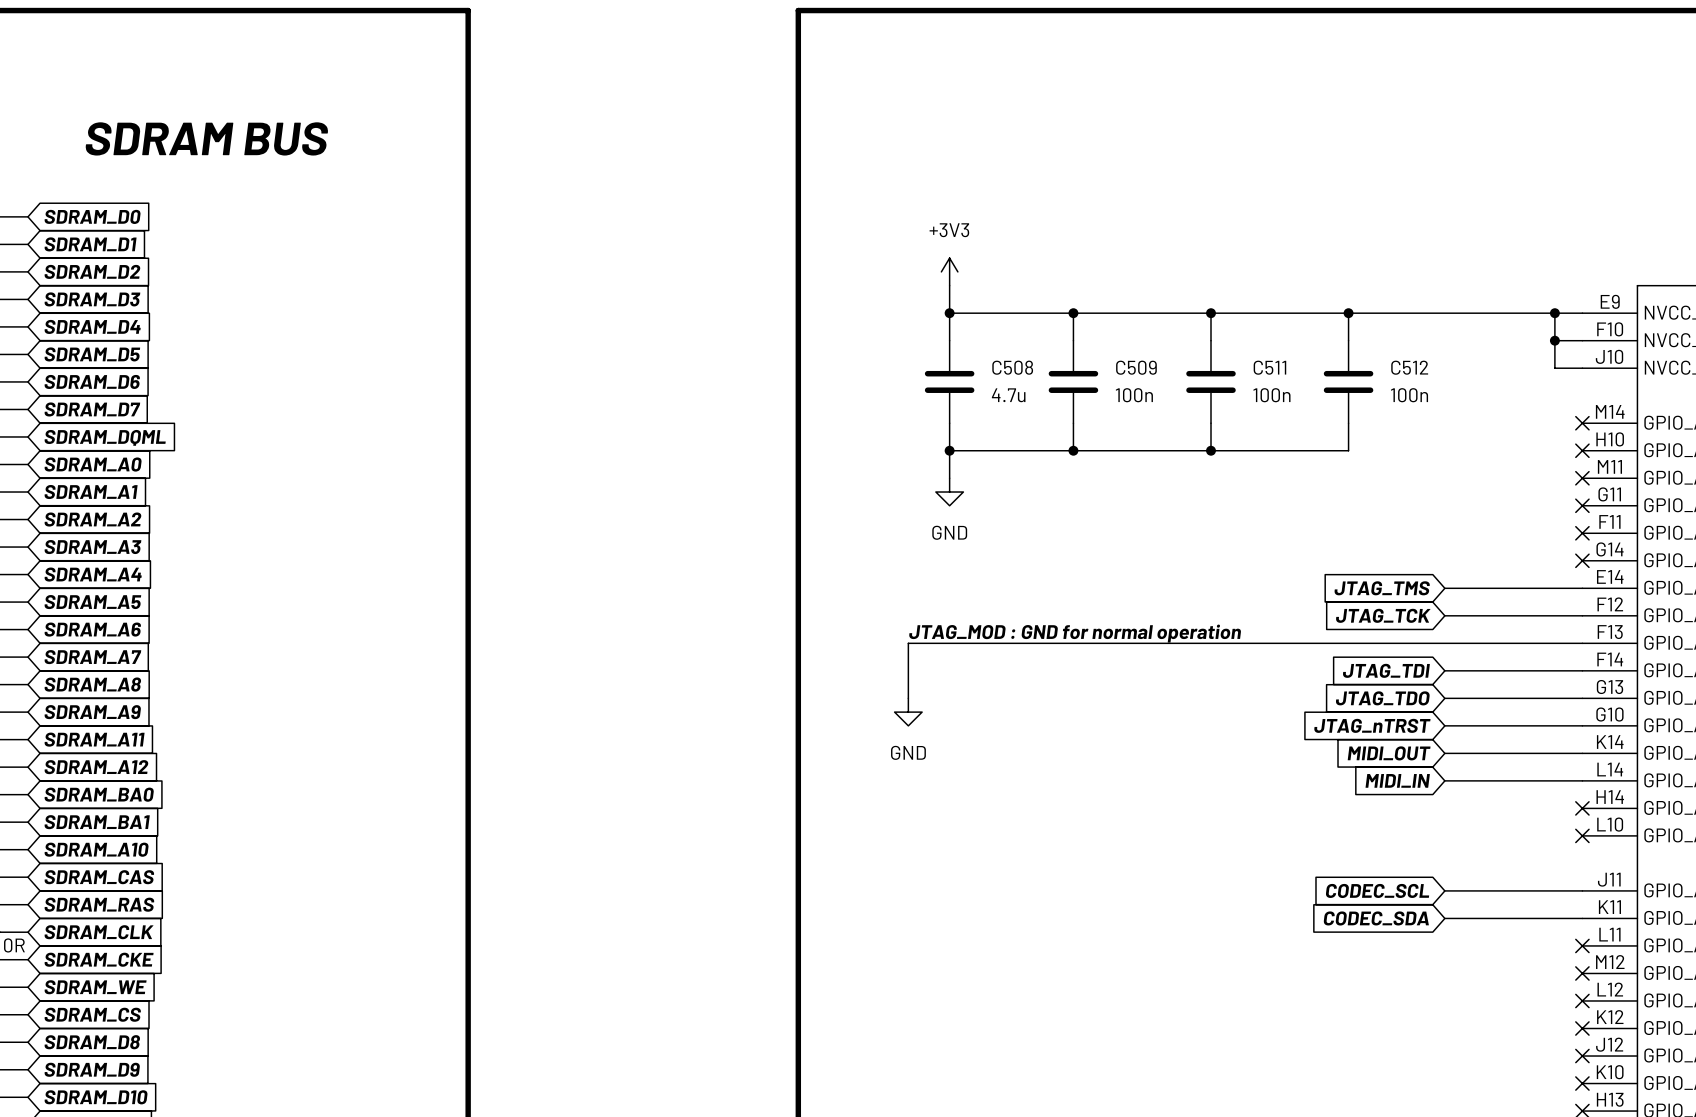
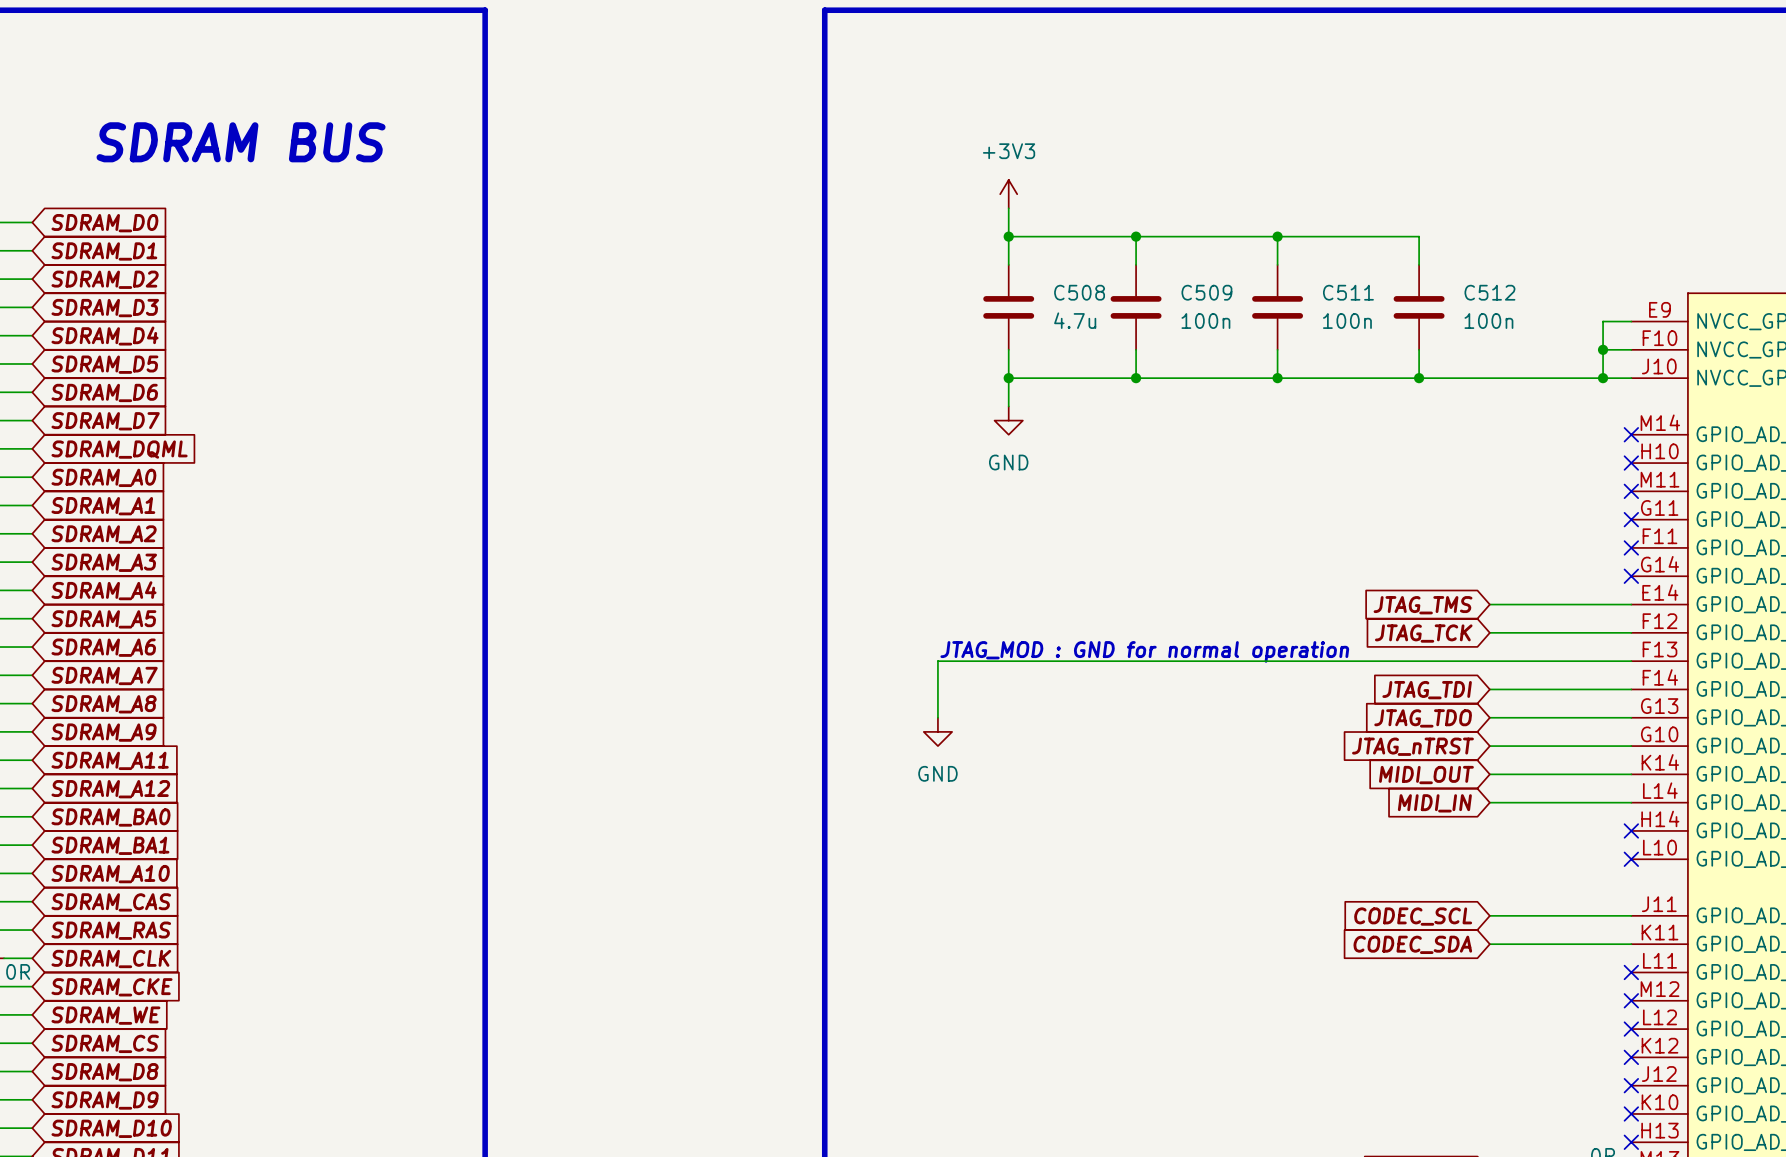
wire: none -> (1008, 236) (1419, 236) (1419, 264)
junction: none -> (1008, 236)
junction: none -> (1136, 236)
junction: none -> (1277, 236)
power symbol position: +3V3 (949, 271) -> +3V3 (1008, 194)
wire: (949, 285) (949, 340) -> (1008, 208) (1008, 264)
wire: (949, 313) (1554, 313) -> none
junction: (949, 313) -> none
wire: (1073, 313) (1073, 340) -> (1136, 236) (1136, 264)
junction: (1073, 313) -> none
wire: (1211, 313) (1211, 340) -> (1277, 236) (1277, 264)
junction: (1211, 313) -> none
wire: (1348, 313) (1348, 340) -> (1419, 349) (1419, 378)
junction: (1348, 313) -> none
junction position: (1554, 313) -> (1603, 378)
wire: none -> (1008, 378) (1603, 378)
junction: none -> (1008, 378)
junction: none -> (1136, 378)
junction: none -> (1277, 378)
junction: none -> (1419, 378)
C508 position: (949, 381) -> (1008, 307)
C509 position: (1073, 381) -> (1136, 307)
C511 position: (1211, 381) -> (1277, 307)
C512 position: (1348, 381) -> (1419, 307)
wire: (949, 423) (949, 478) -> (1008, 349) (1008, 406)
wire: (1073, 423) (1073, 450) -> (1136, 349) (1136, 378)
wire: (1211, 423) (1211, 450) -> (1277, 349) (1277, 378)
wire: (1348, 423) (1348, 450) (949, 450) -> none
junction: (949, 450) -> none
junction: (1073, 450) -> none
junction: (1211, 450) -> none
power symbol position: GND (949, 492) -> GND (1008, 420)

